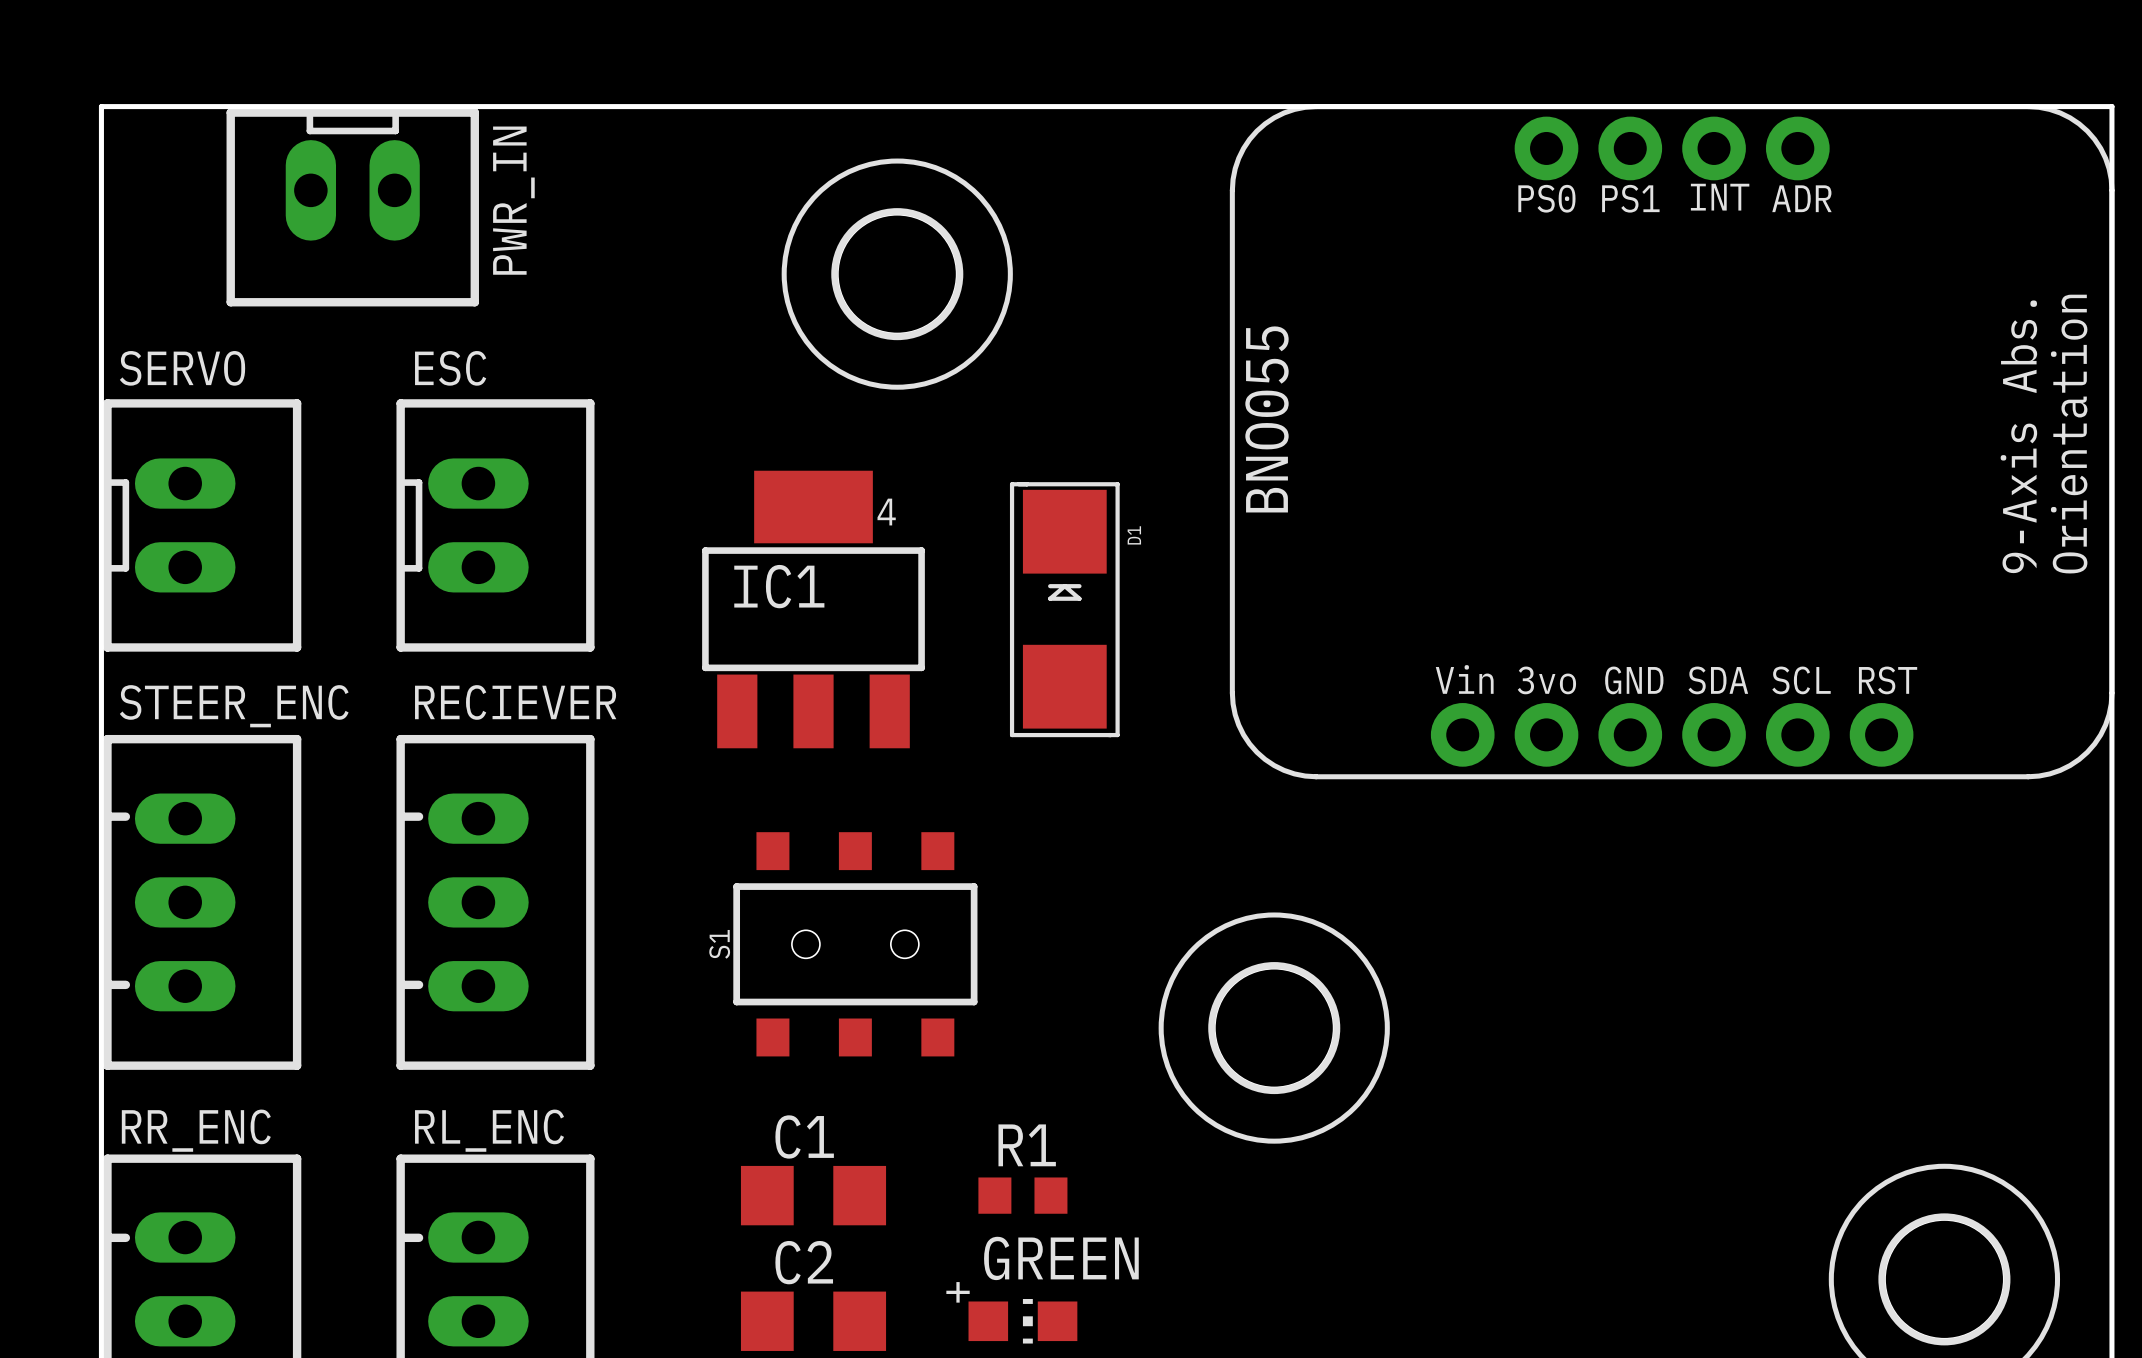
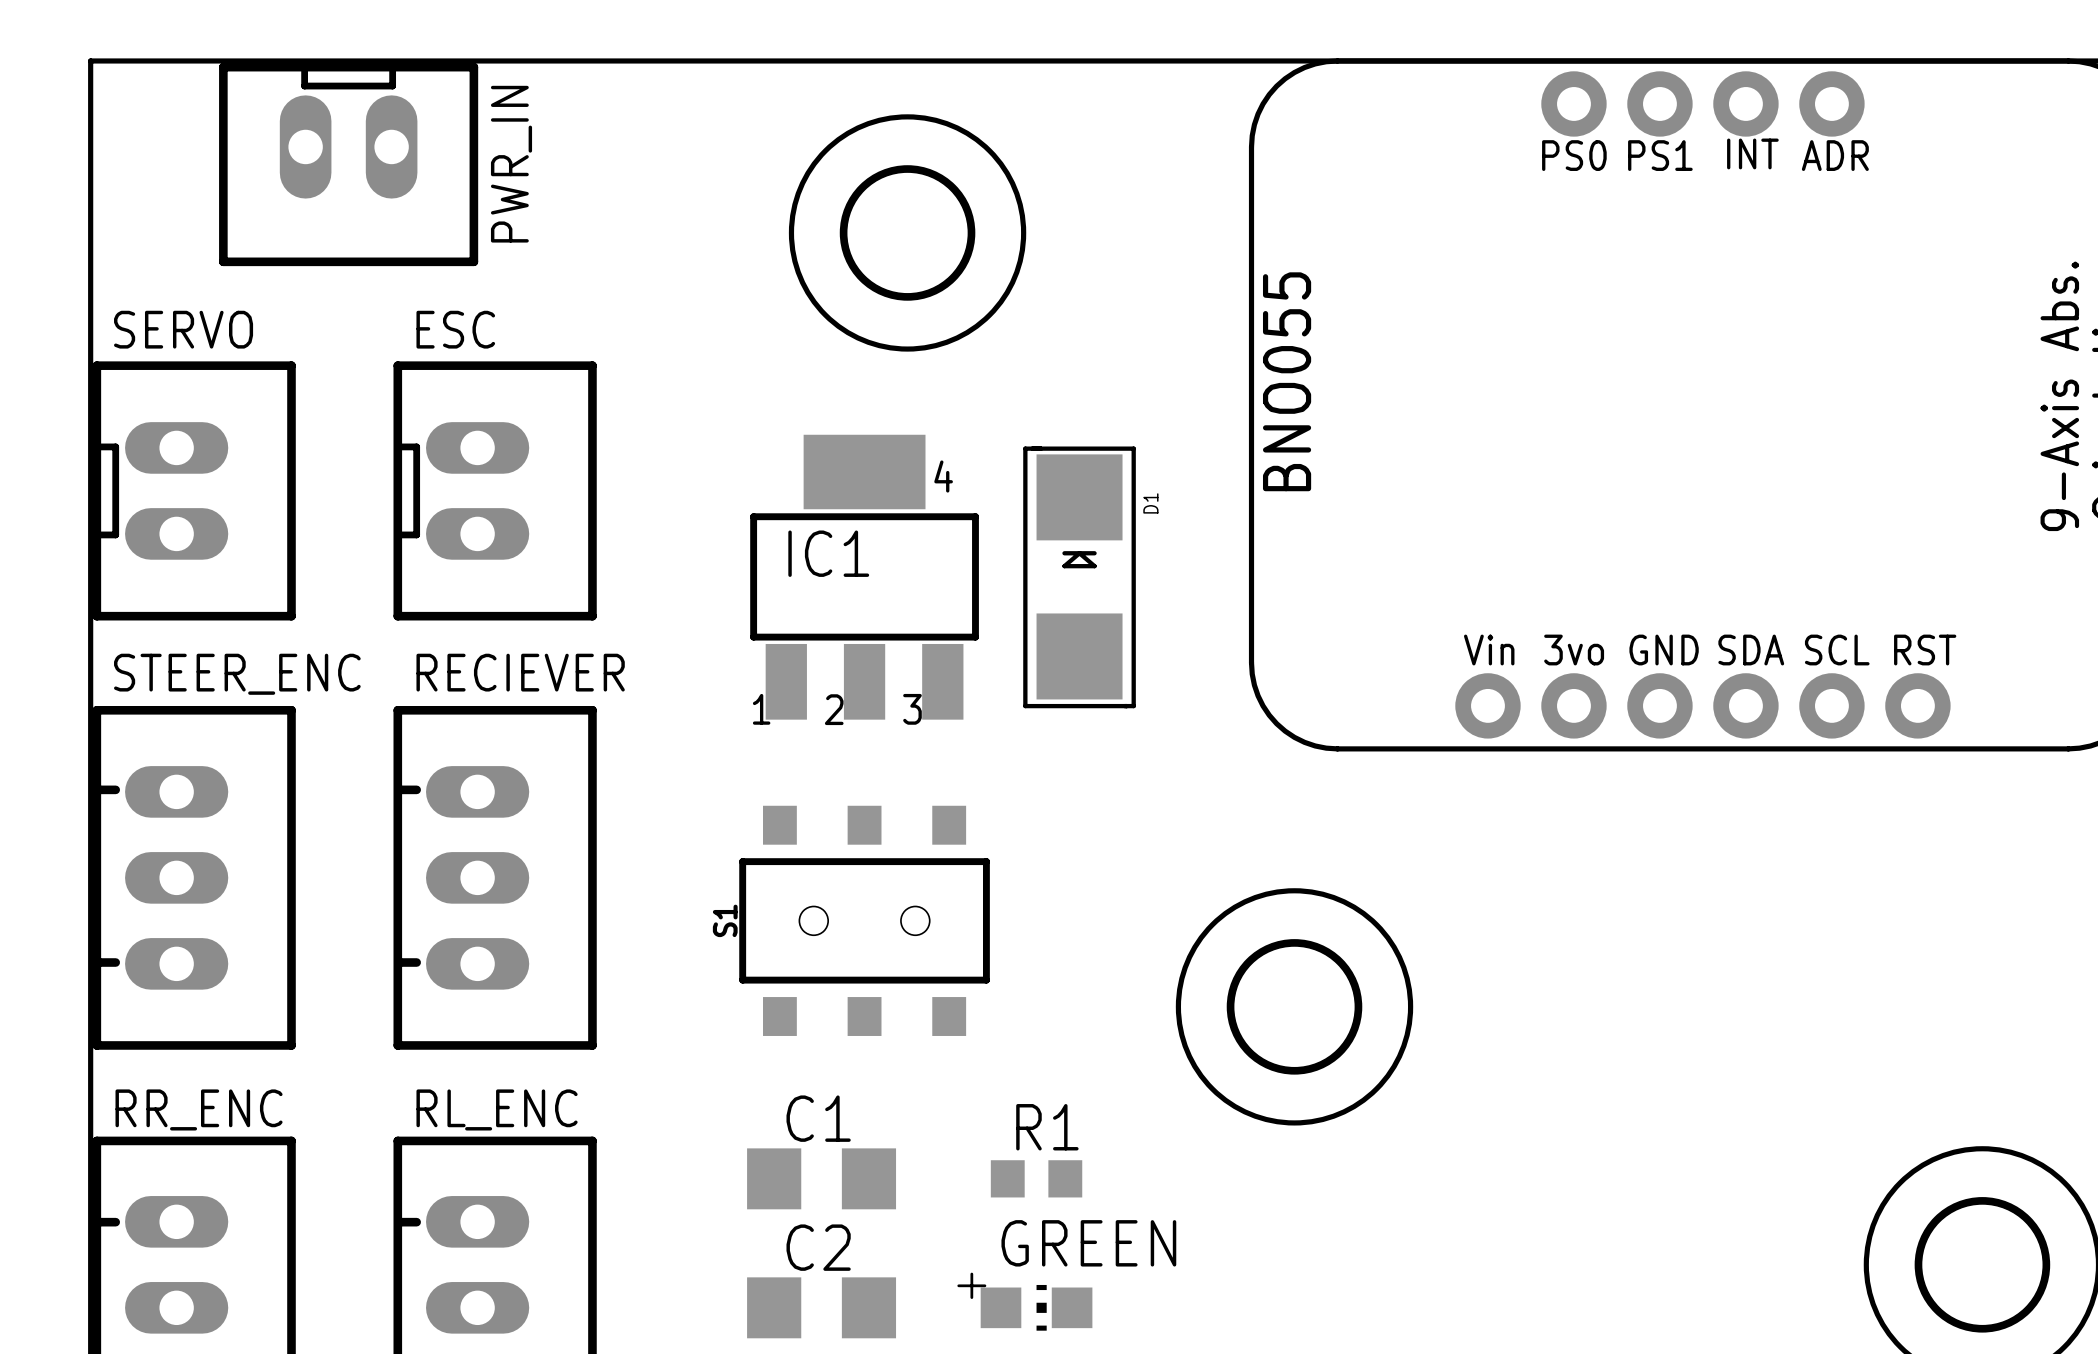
IC1 position: (813, 609) -> (864, 577)
IC1 text: none -> 1 (761, 709)
IC1 text: none -> 2 (834, 709)
IC1 text: none -> 3 (912, 709)

